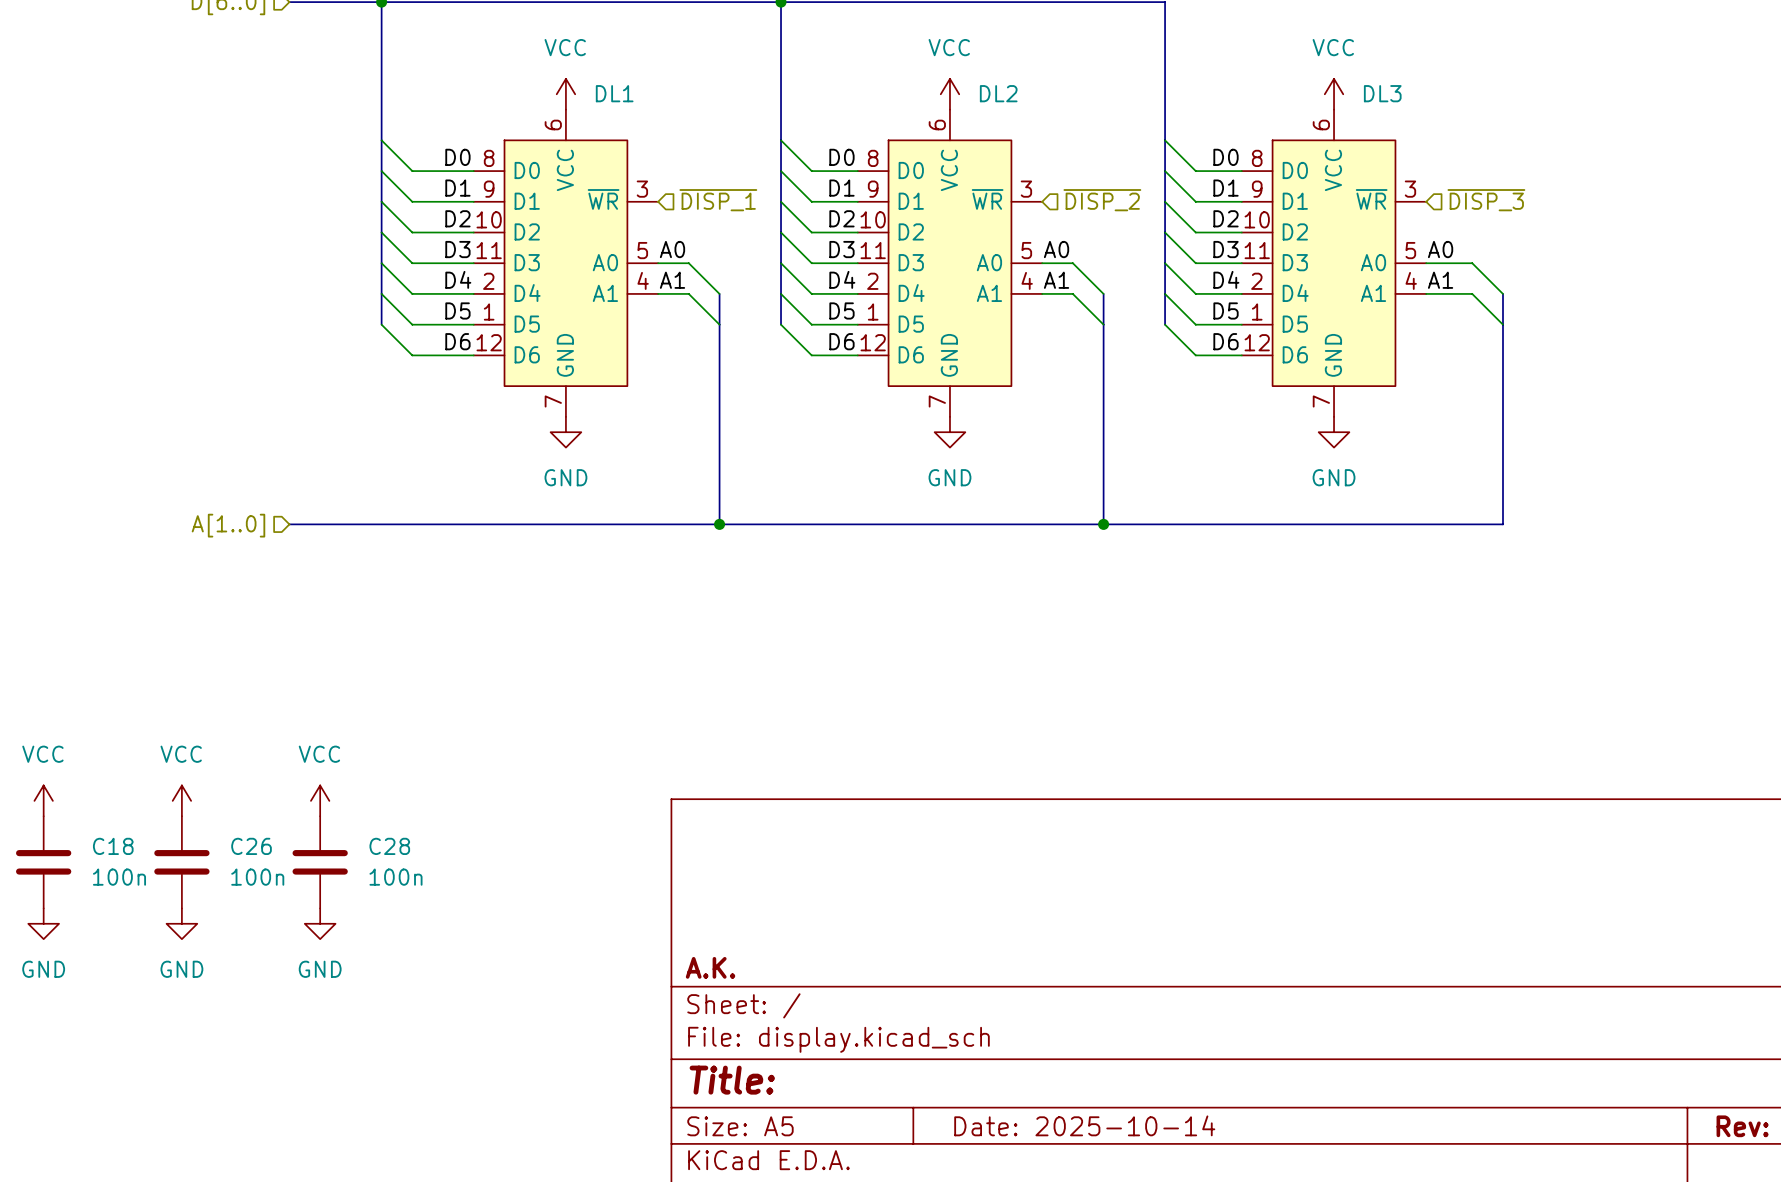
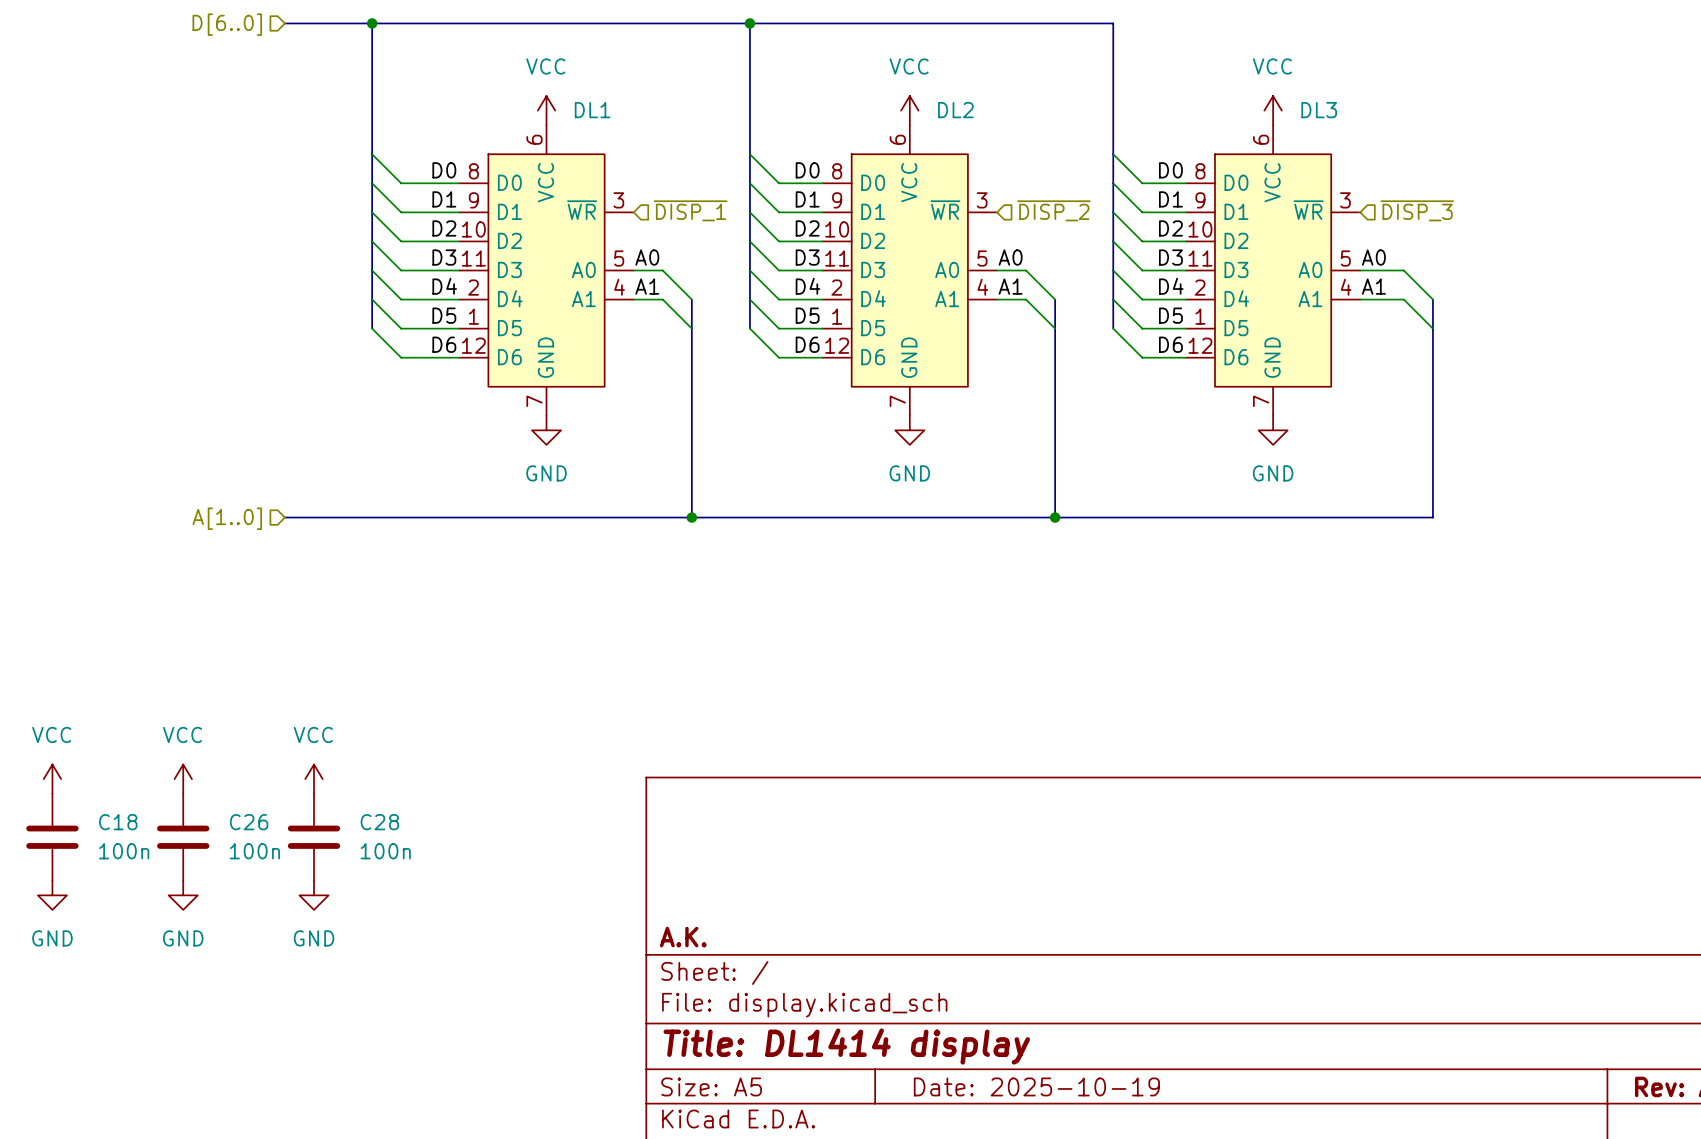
title block: Title: (732, 1080) -> Title: DL1414 display (846, 1046)
title block: Date: 2025-10-14 (1084, 1125) -> Date: 2025-10-19 (1036, 1086)

